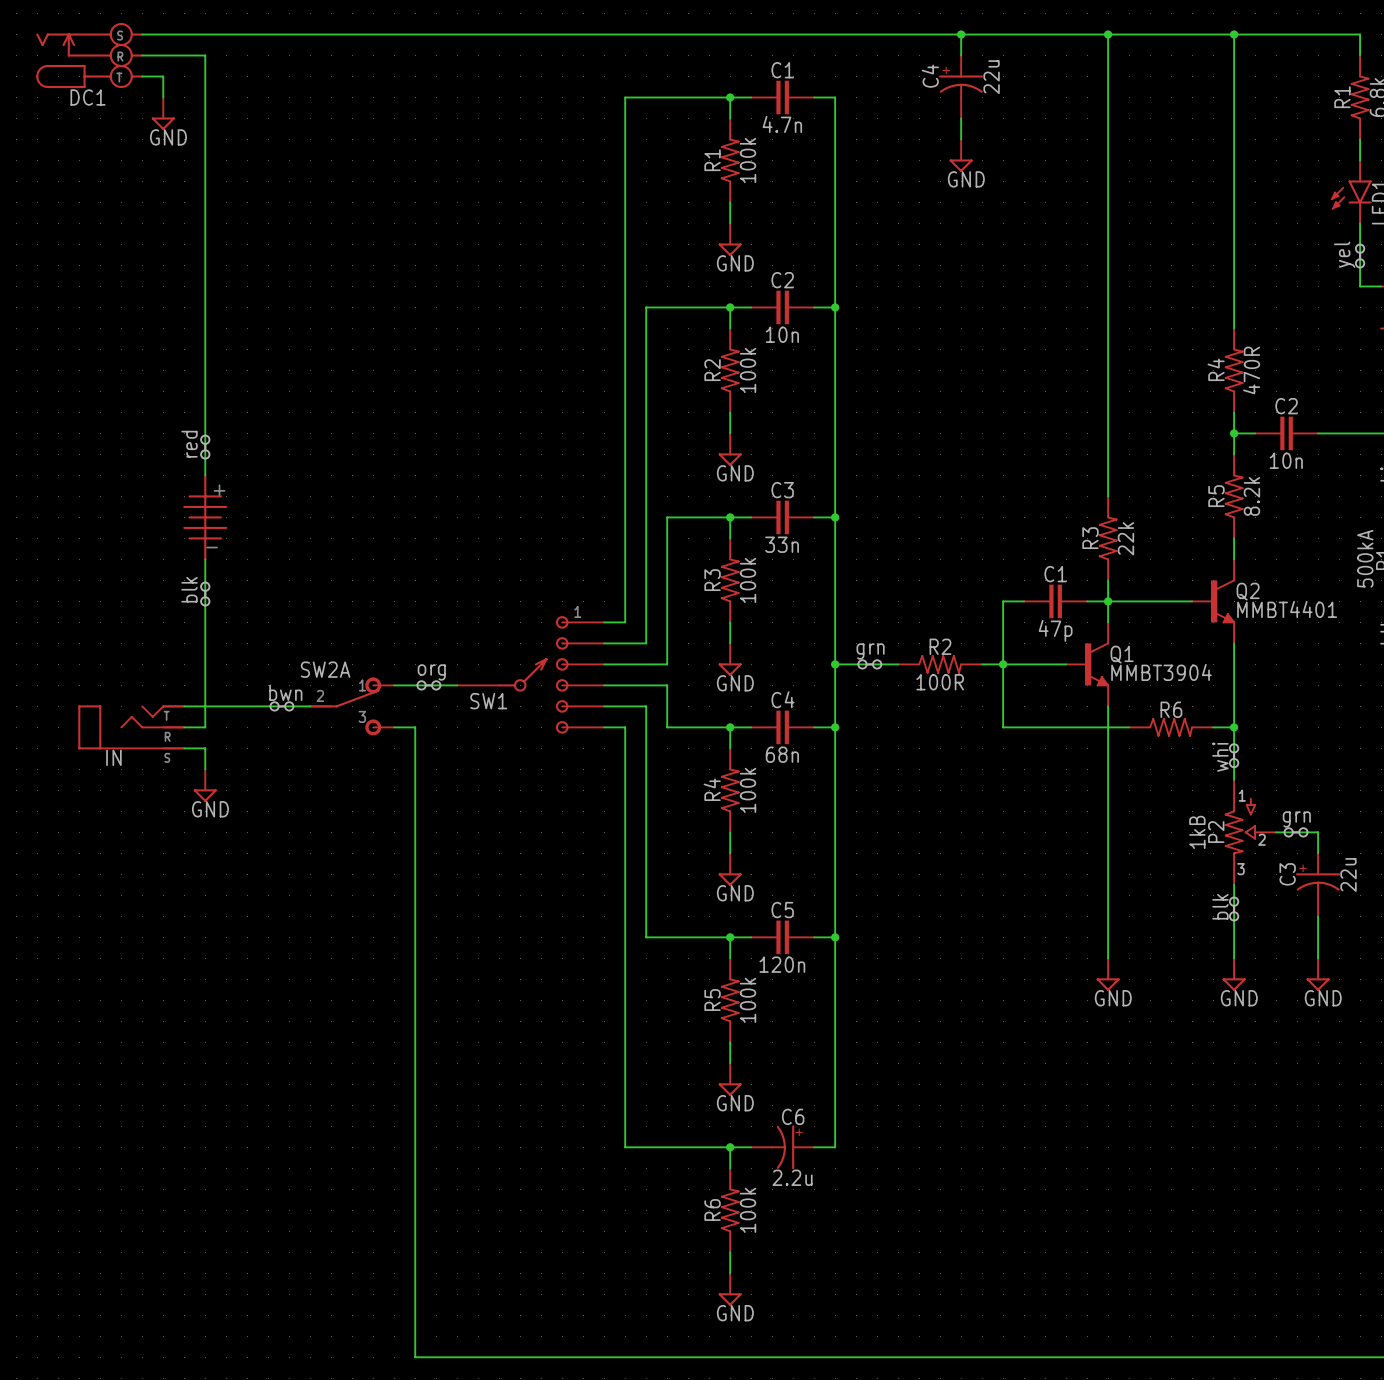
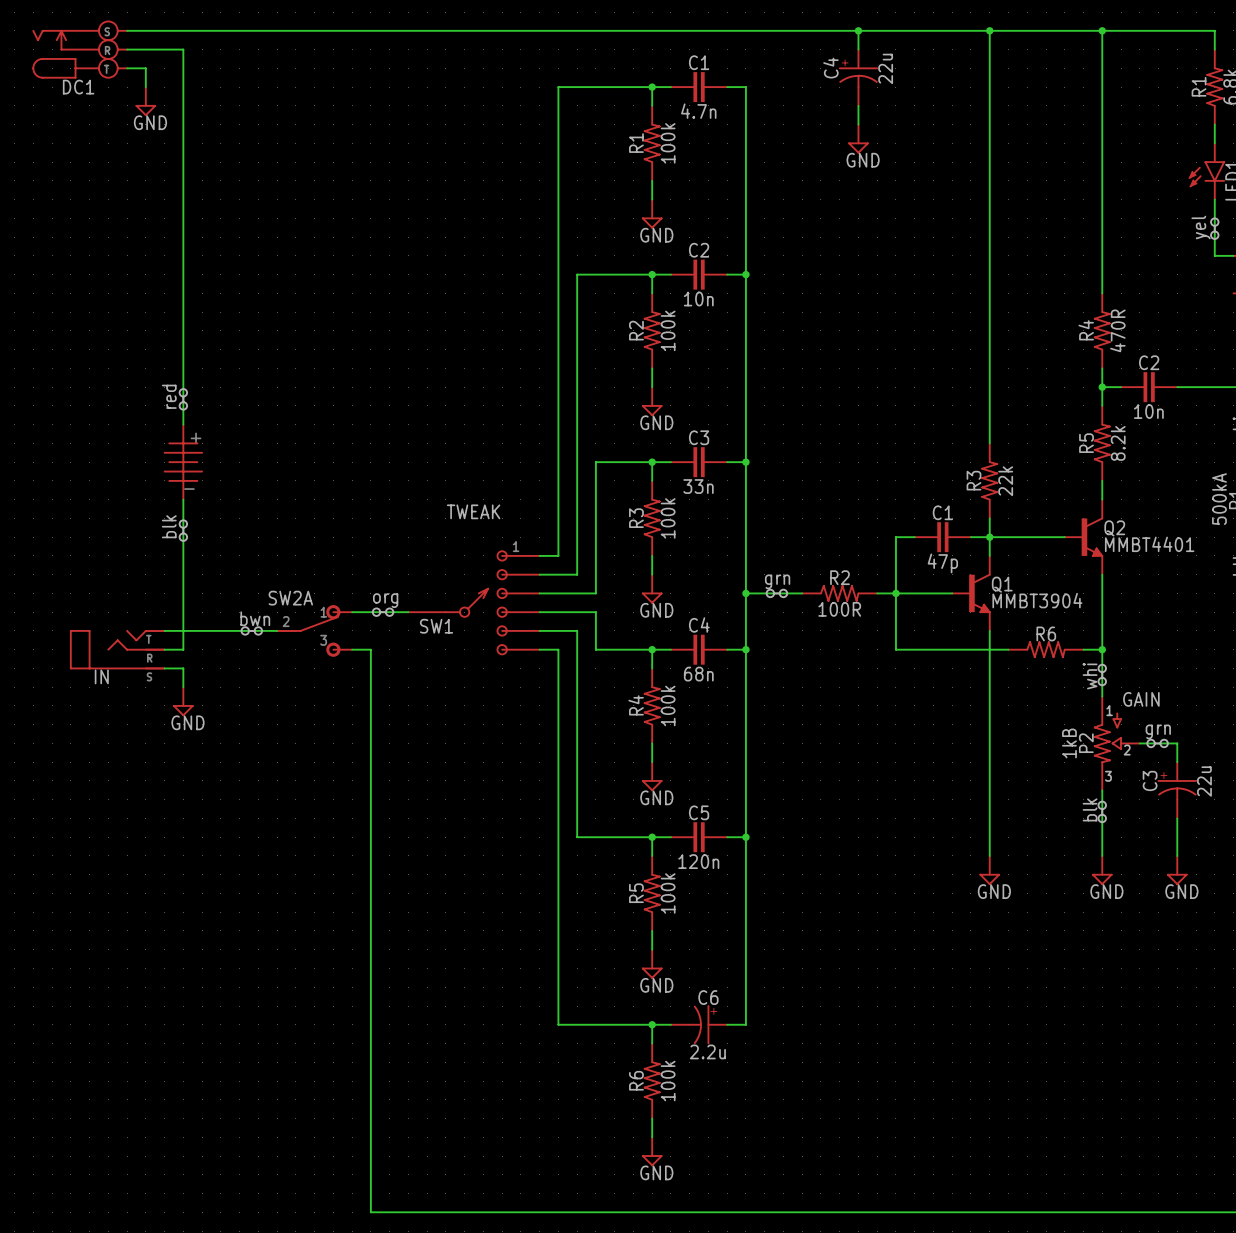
text: none -> TWEAK (473, 511)
text: none -> GAIN (1141, 699)

